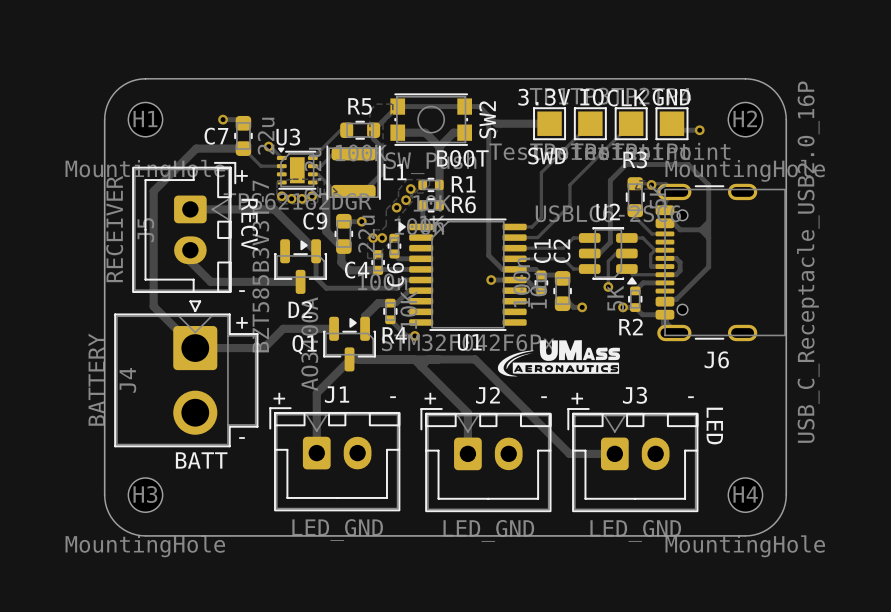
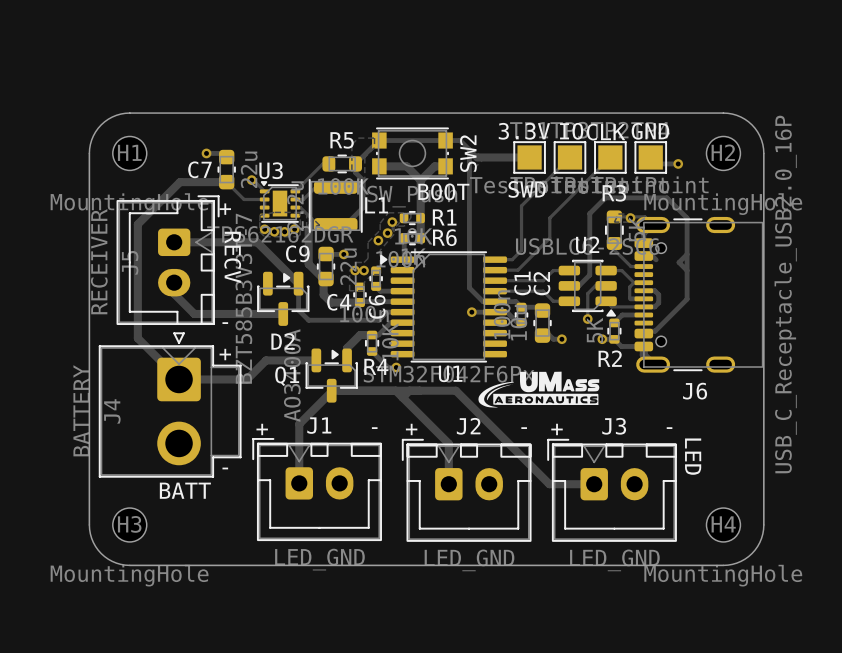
track: (677, 227) (680, 229) (708, 229) -> none

